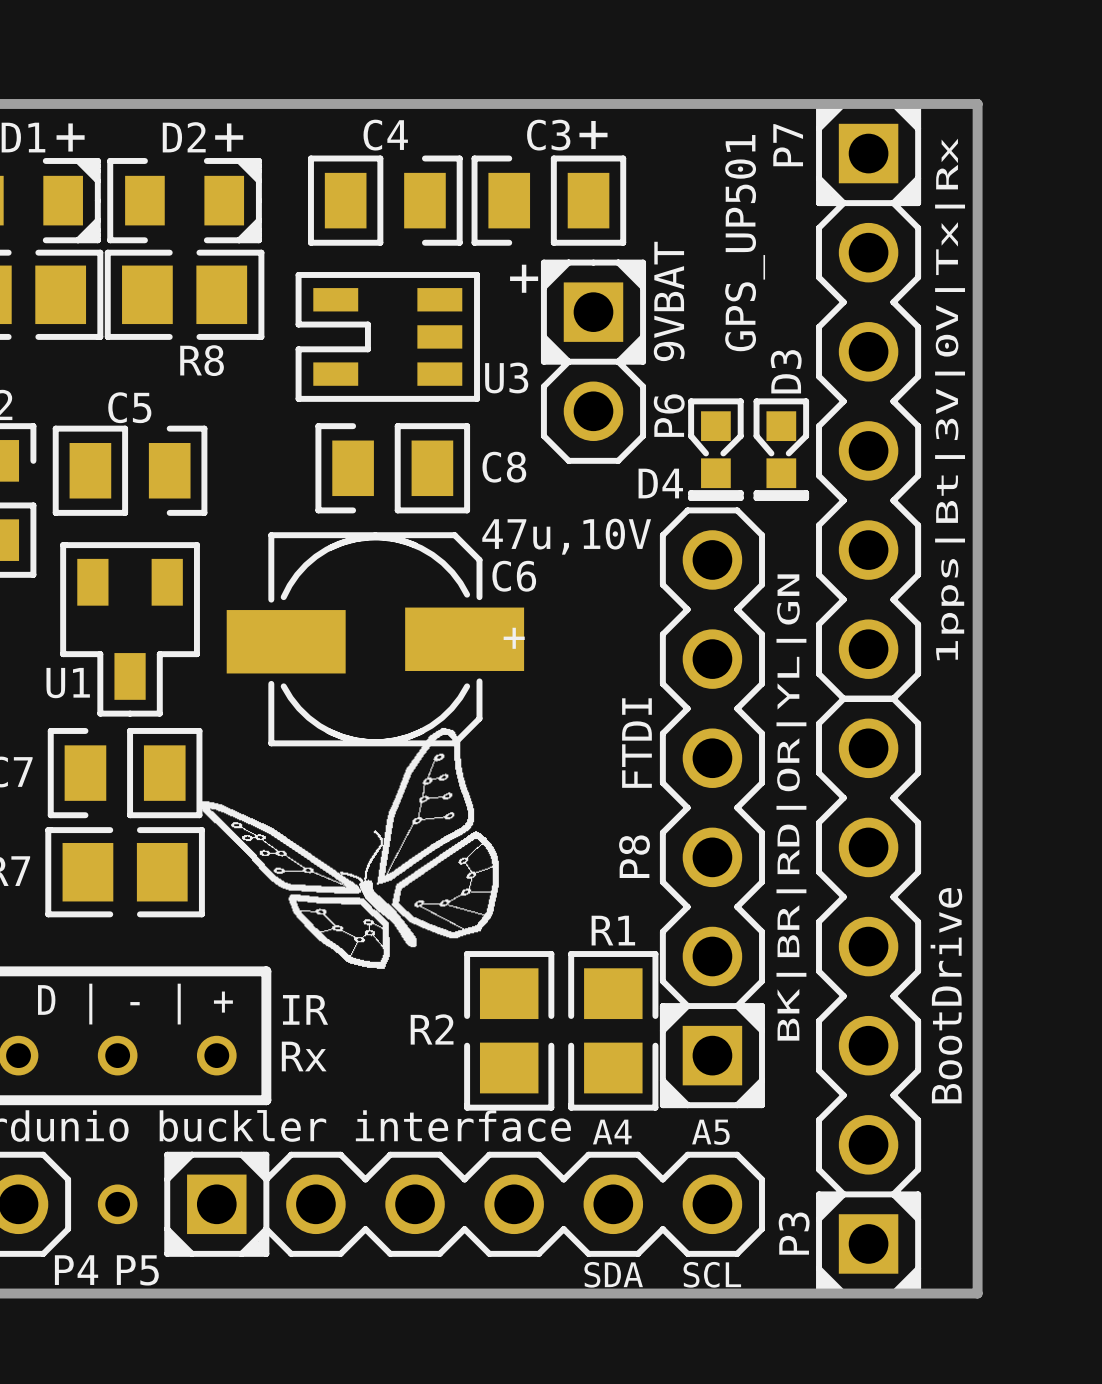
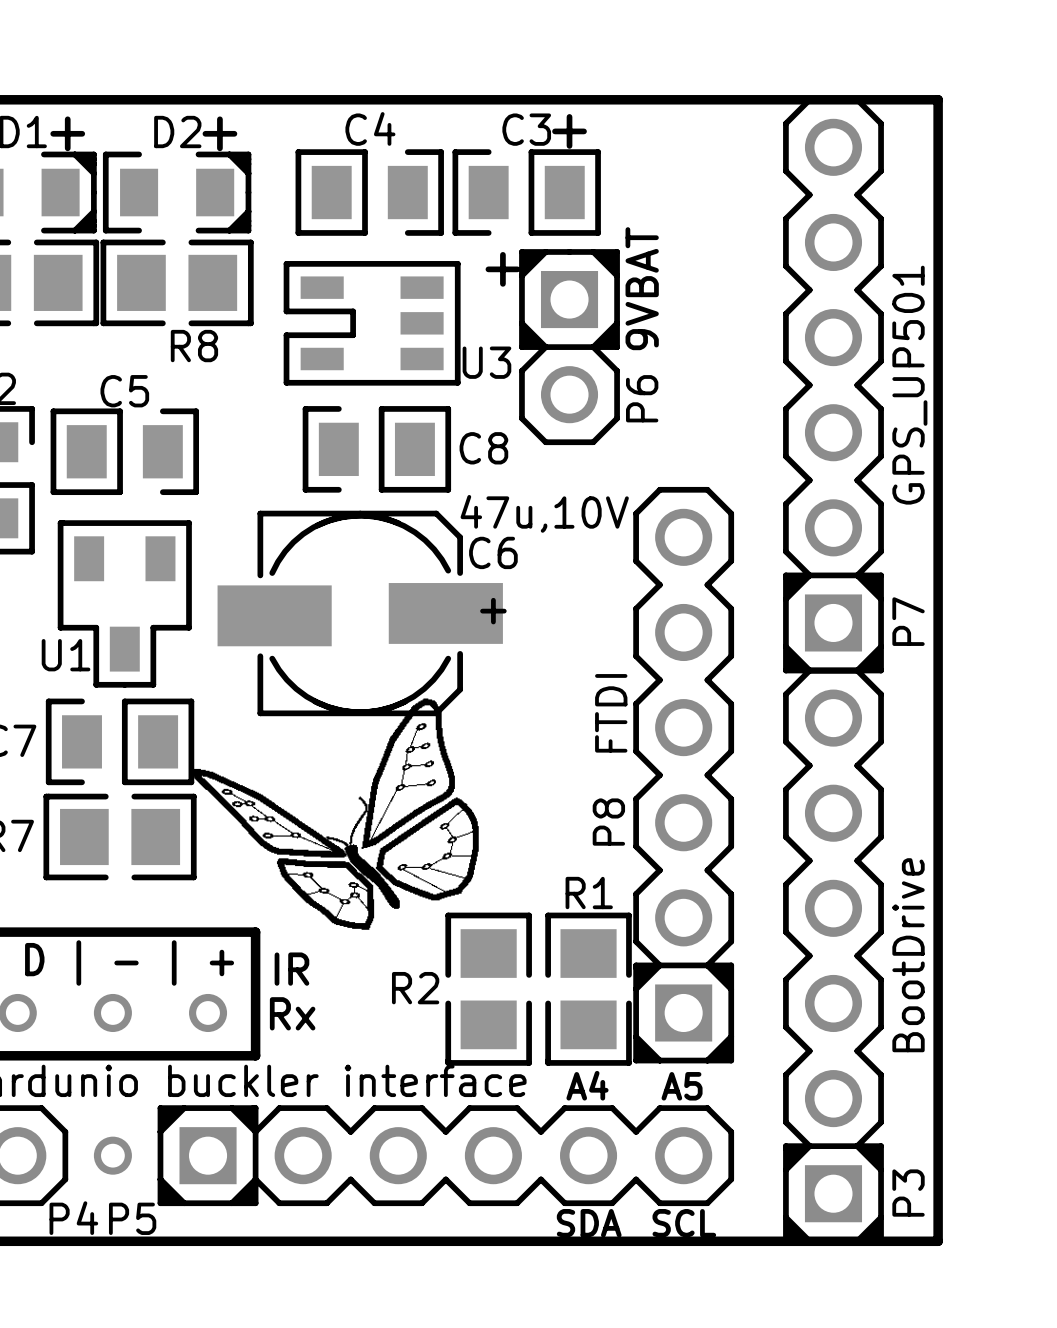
P7 value position: GPS_UP501 (745, 243) -> GPS_UP501 (909, 385)
text: 1pps|Bt|3V|0V|Tx|Rx (950, 399) -> none
P7 rotation: 0° (868, 401) -> 180° (833, 385)
D4: (715, 449) -> none
D3: (781, 449) -> none
text: BK|BR|RD|OR|YL|GN (791, 807) -> none
P3 name position: P3 (794, 1233) -> P3 (908, 1193)

